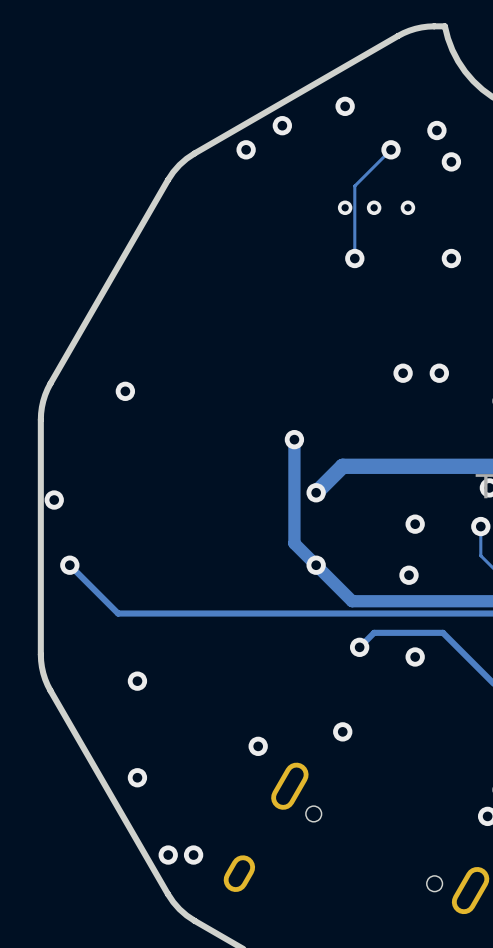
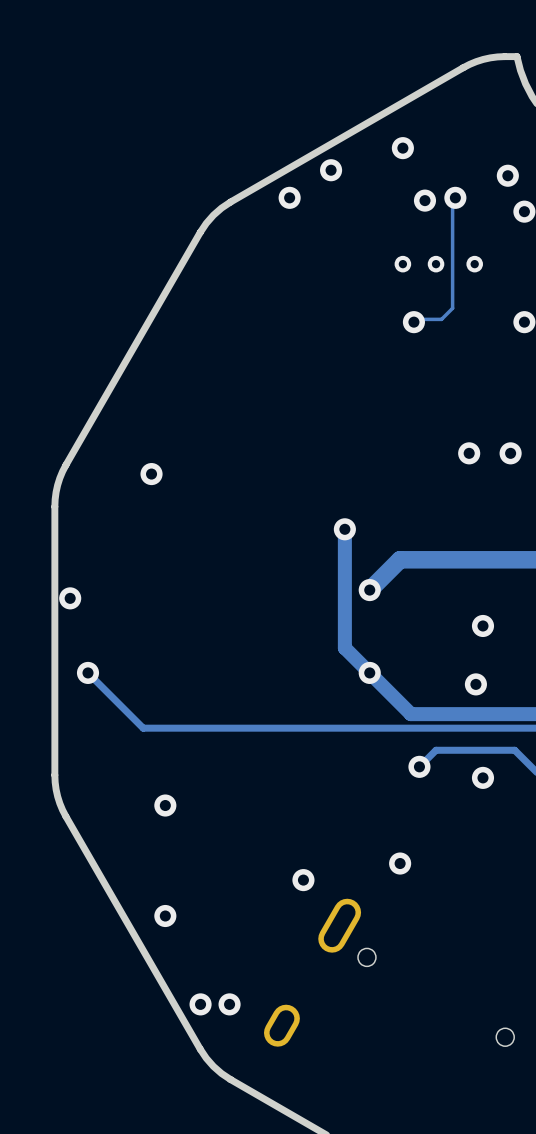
via: none -> (424, 200)
track: (388, 152) (354, 186) (354, 258) -> (452, 200) (452, 308) (441, 319) (416, 319) (413, 322)

